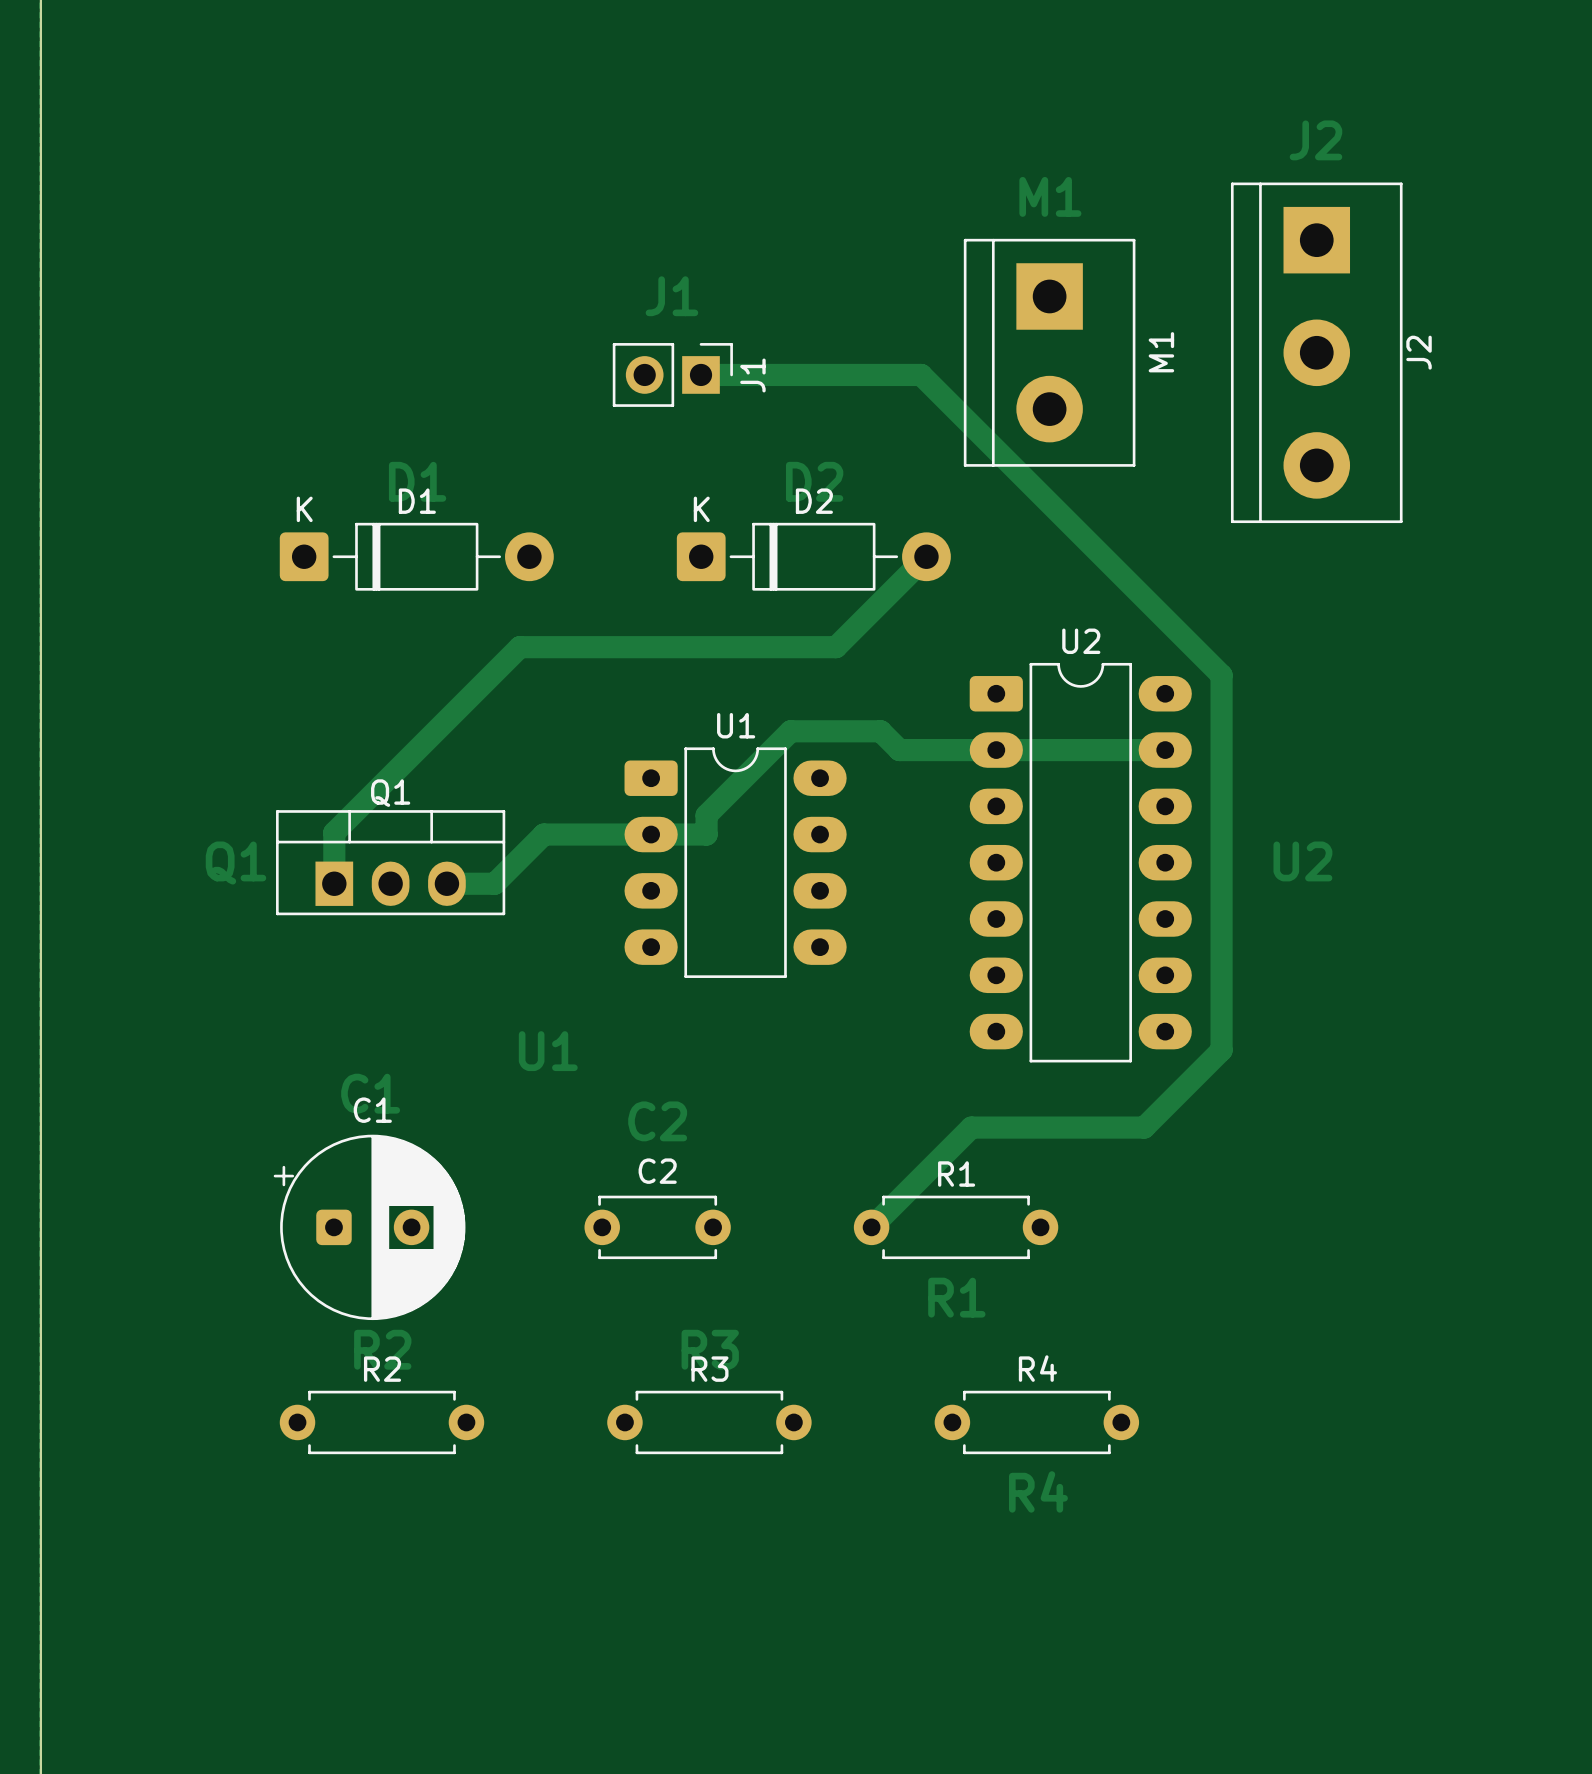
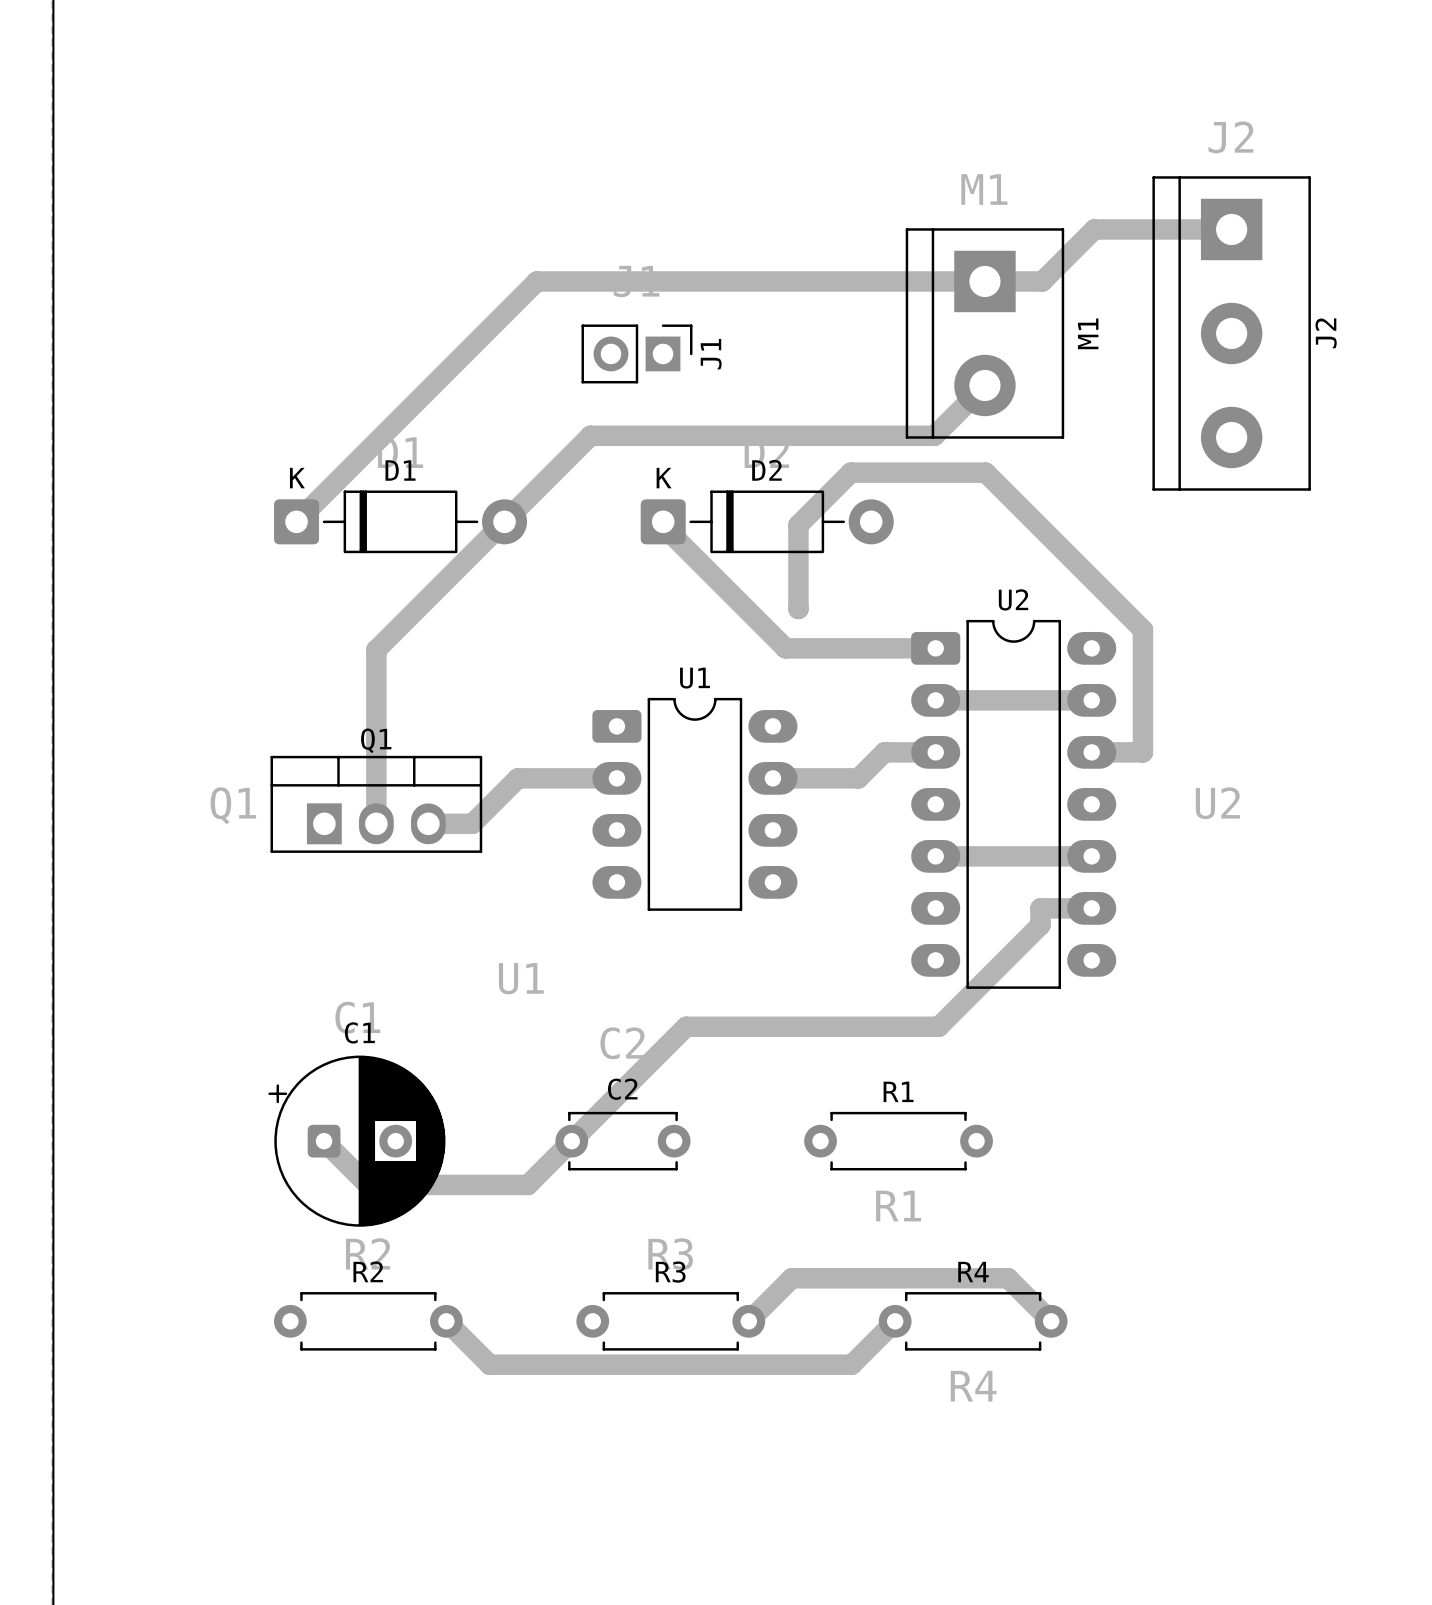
track: none -> (1231, 229) (1094, 229) (1042, 281) (536, 281) (296, 521)
track: (701, 374) (921, 374) (1221, 675) (1221, 1050) (1144, 1127) (971, 1127) (871, 1227) -> none
track: none -> (984, 385) (934, 435) (590, 435) (376, 650) (376, 823)
track: none -> (663, 521) (663, 525) (785, 648) (935, 648)
track: (926, 556) (836, 647) (519, 647) (334, 832) (334, 883) -> none
track: none -> (798, 608) (798, 525) (850, 472) (985, 472) (1142, 629) (1142, 752) (1091, 752)
track: (996, 750) (899, 750) (880, 731) (790, 731) (706, 815) (706, 834) (651, 834) -> none
track: none -> (935, 752) (884, 752) (858, 778) (772, 778)
track: none -> (935, 856) (1091, 856)
track: none -> (1091, 908) (1040, 908) (1040, 925) (938, 1026) (686, 1026) (528, 1184) (367, 1184) (324, 1141)
track: none -> (446, 1321) (489, 1364) (851, 1364) (895, 1321)
track: none -> (748, 1321) (791, 1278) (1008, 1278) (1051, 1321)

